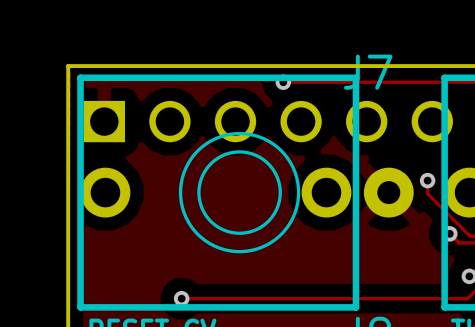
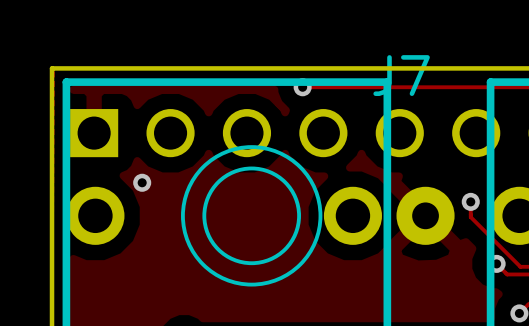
via: none -> (142, 182)

